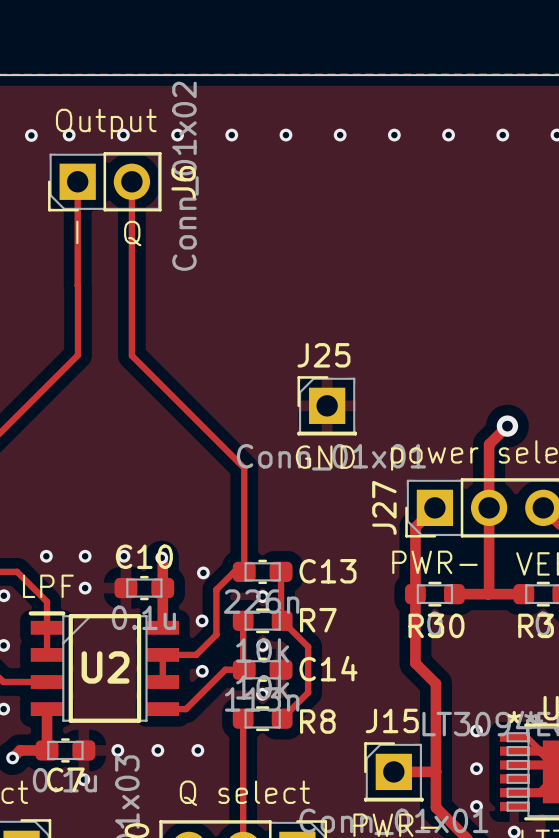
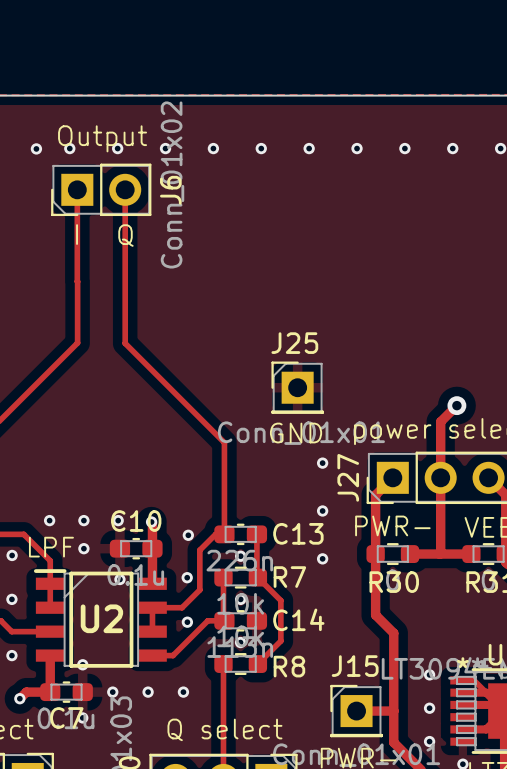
via: none -> (322, 463)
via: none -> (322, 510)
via: none -> (322, 558)
via: none -> (119, 579)
via: none -> (82, 664)

